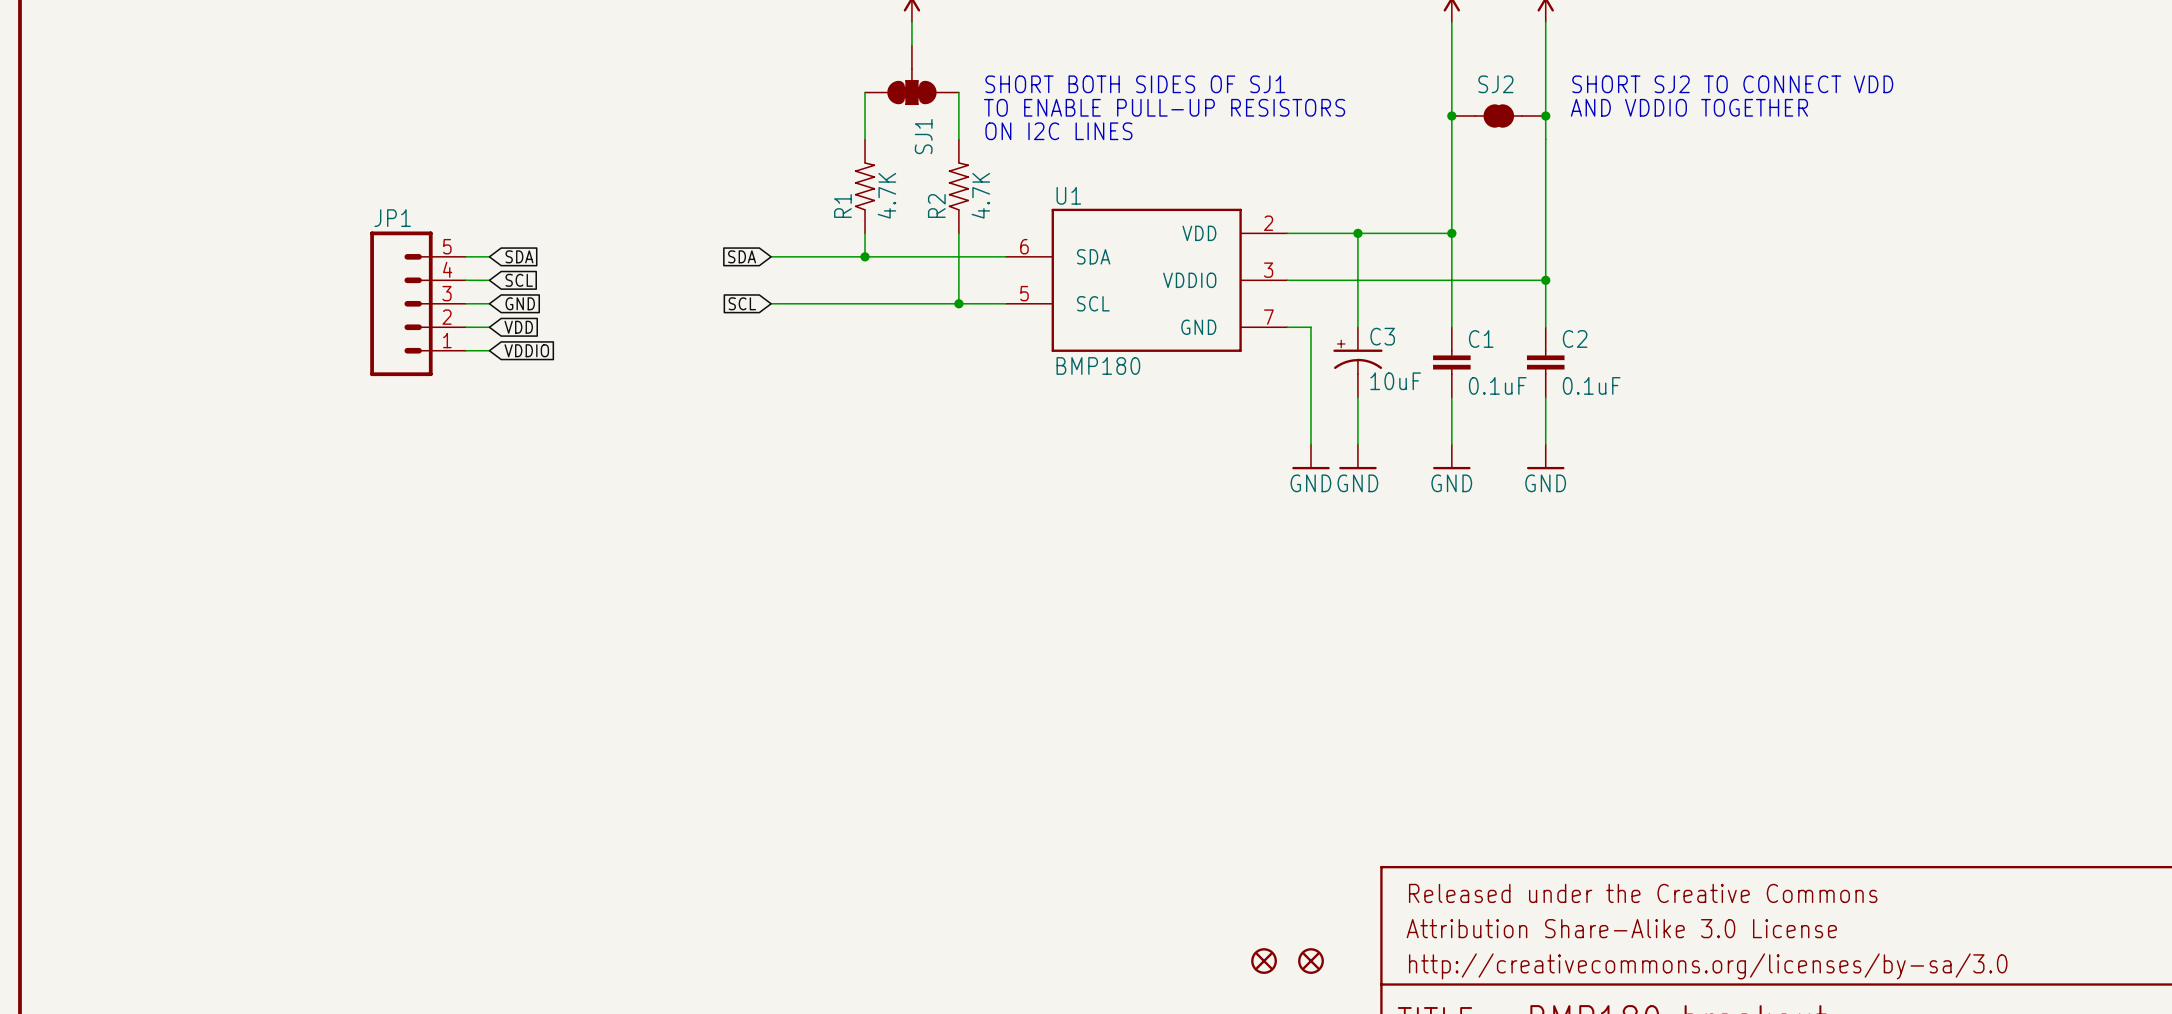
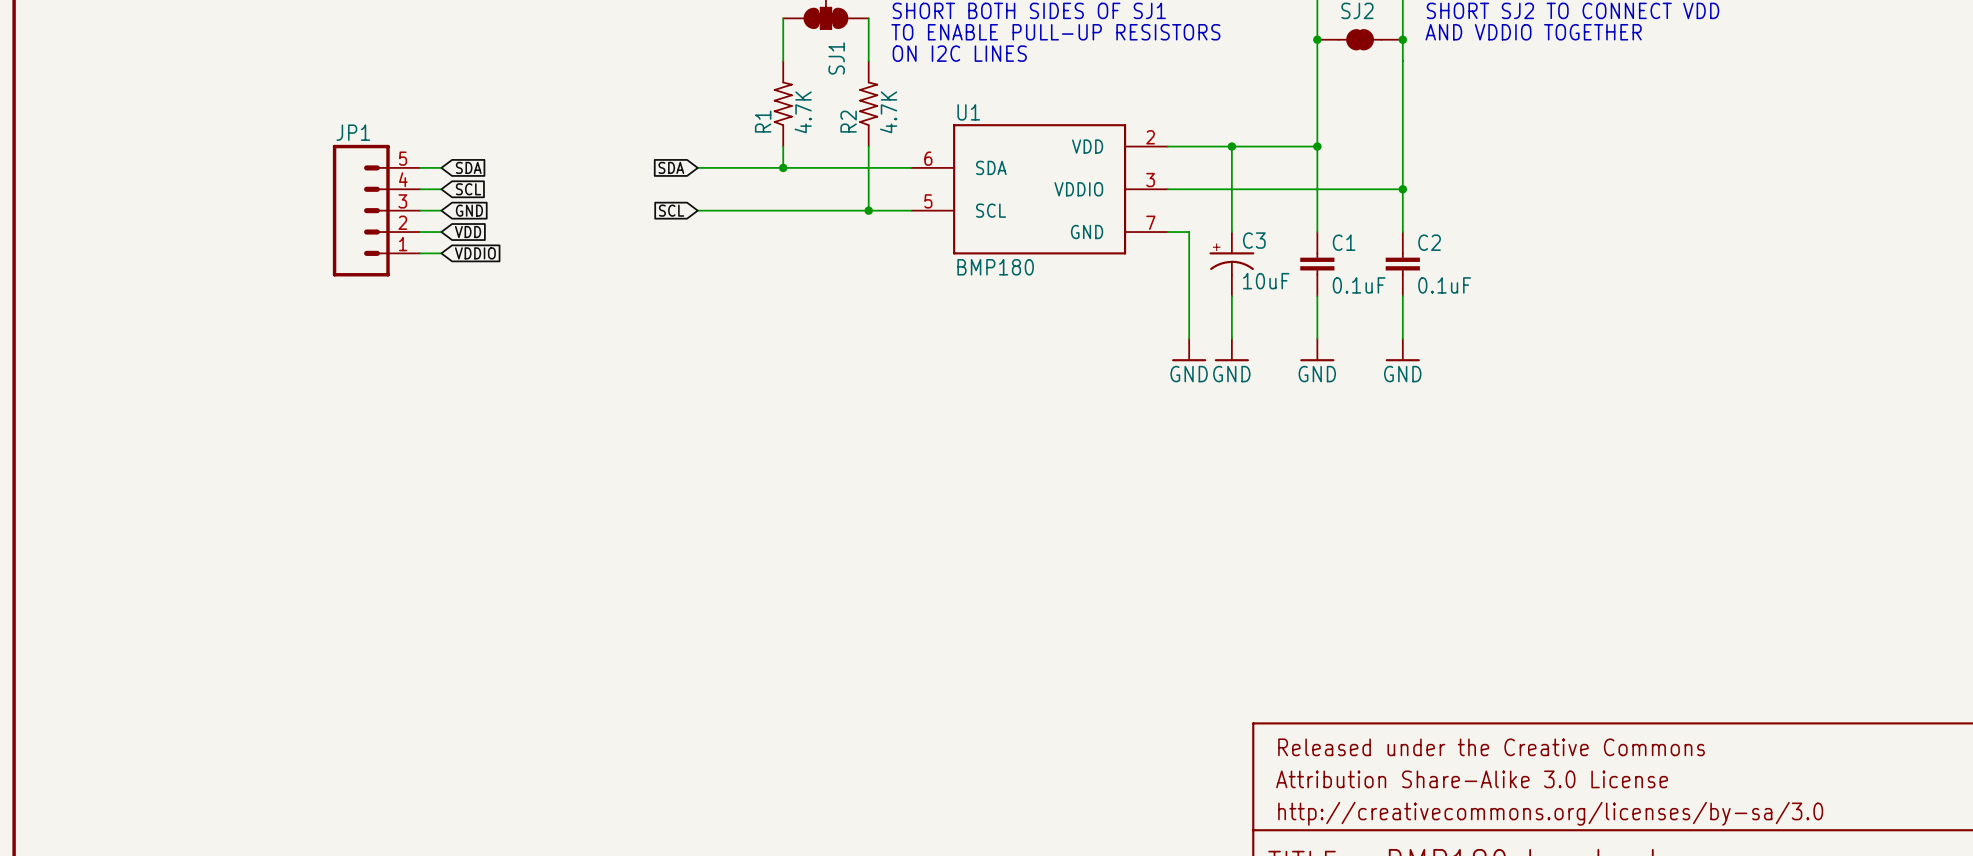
part: (1264, 961) -> none
part: (1311, 961) -> none

